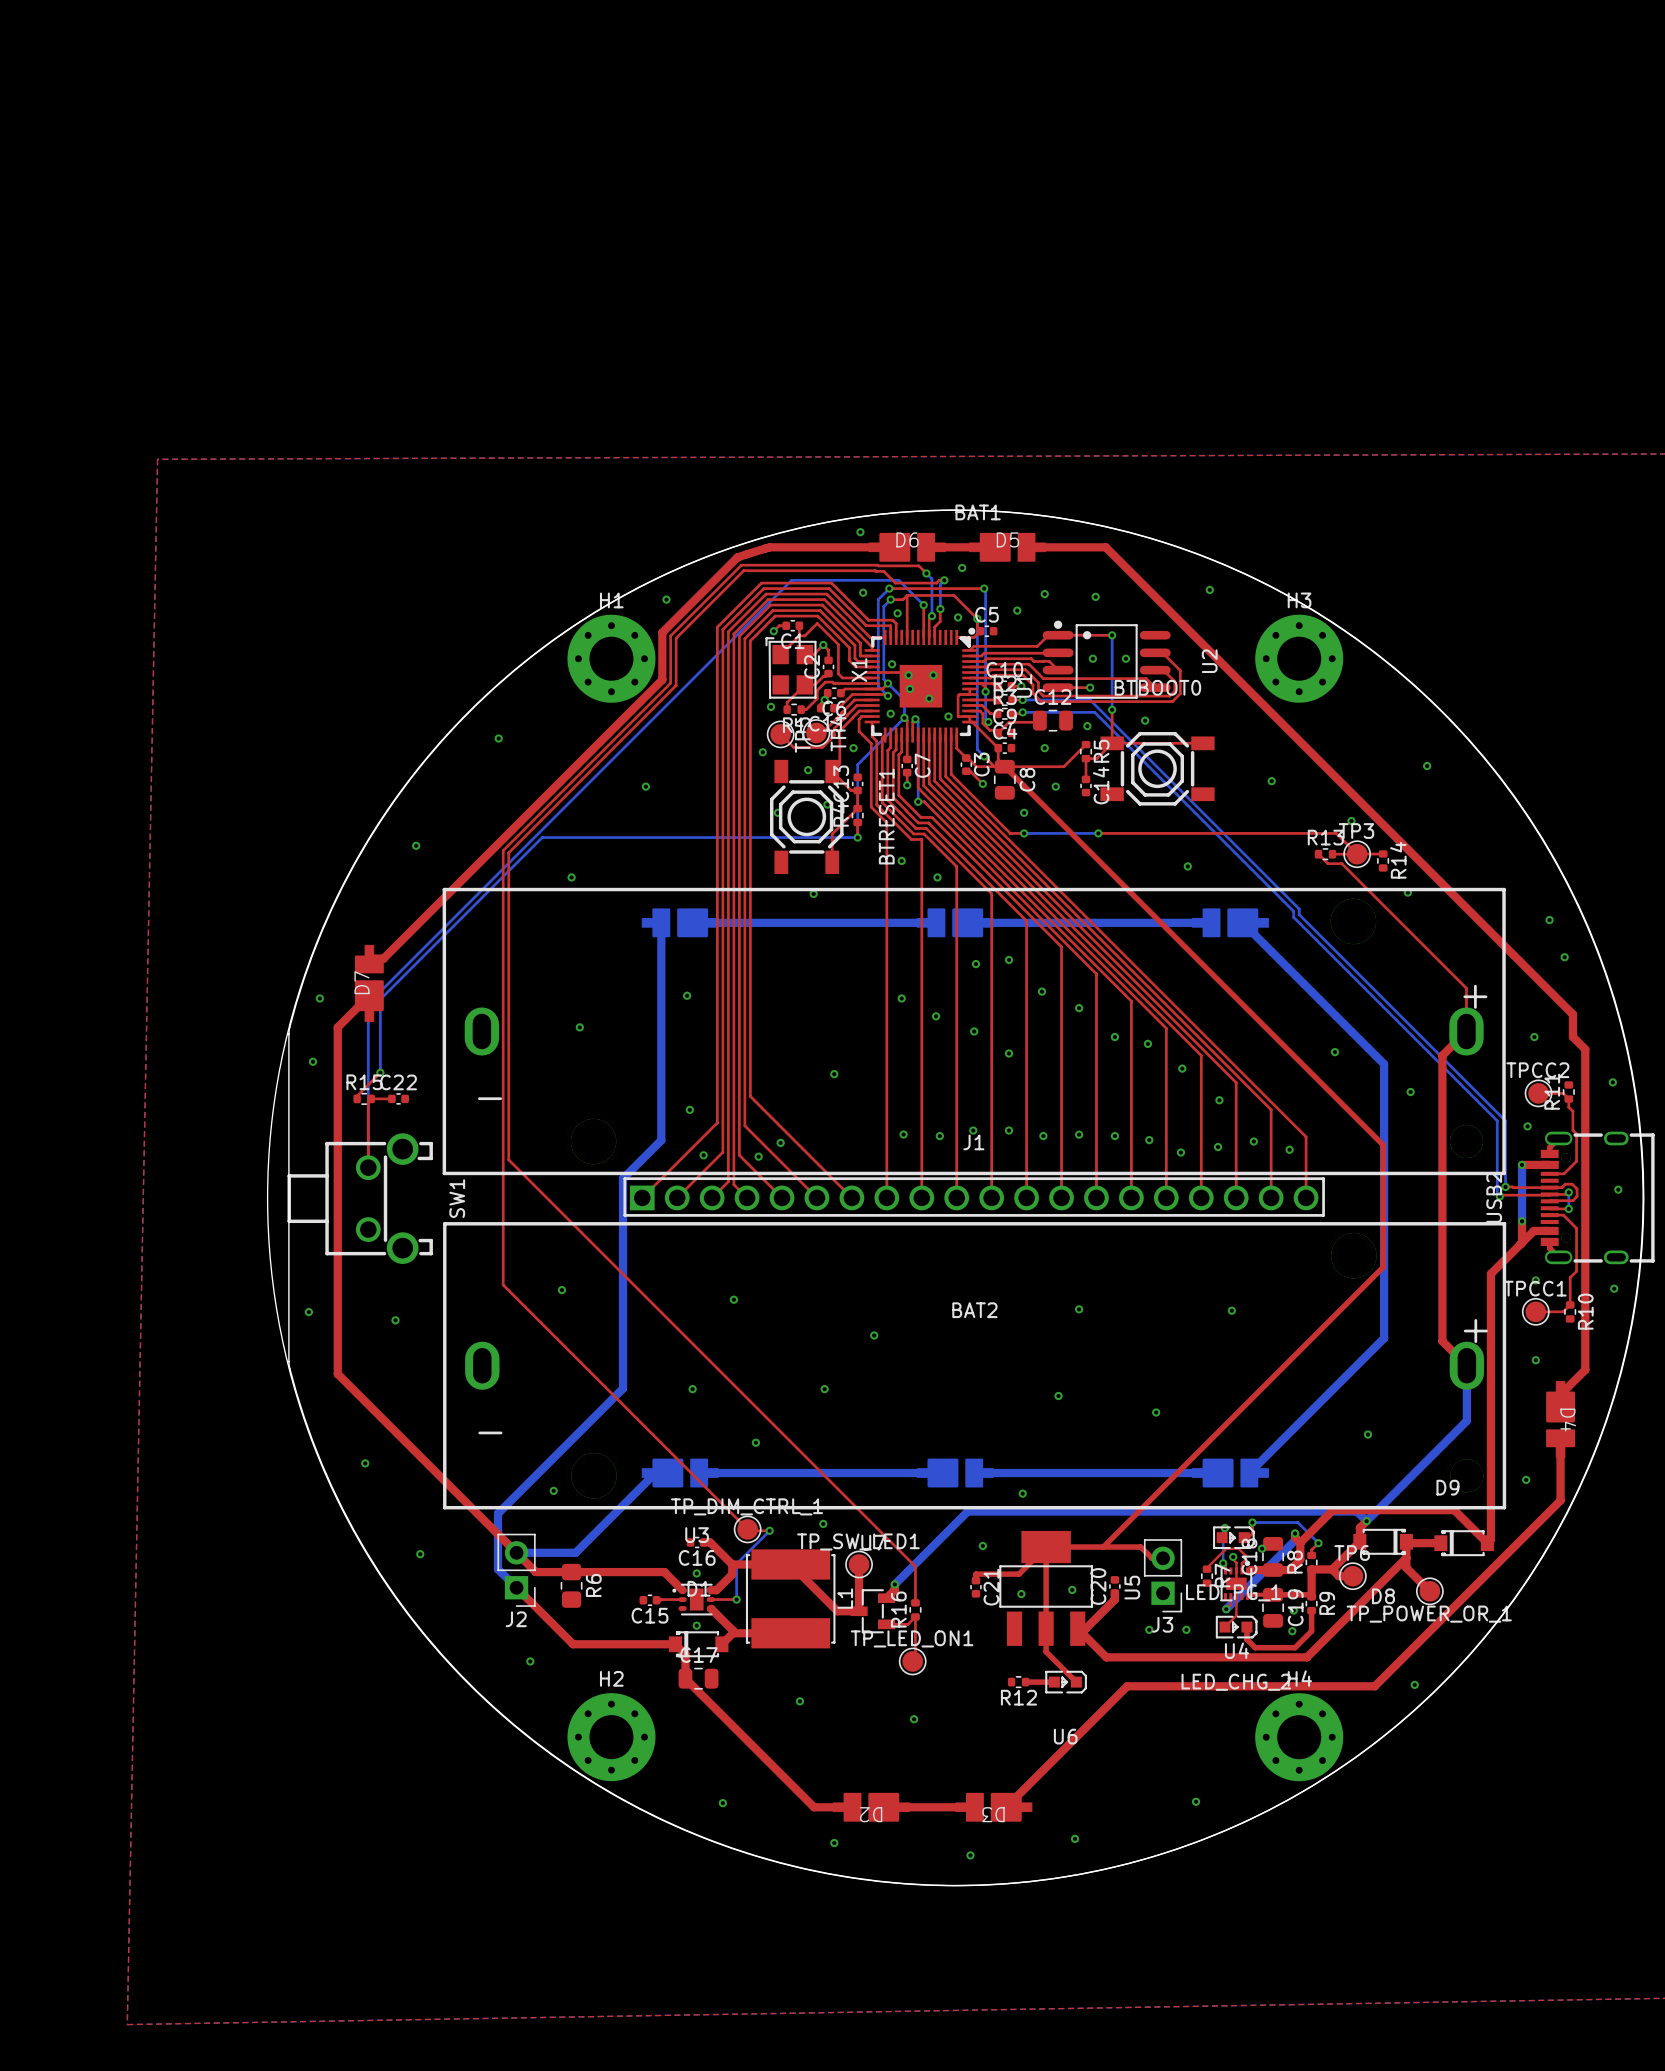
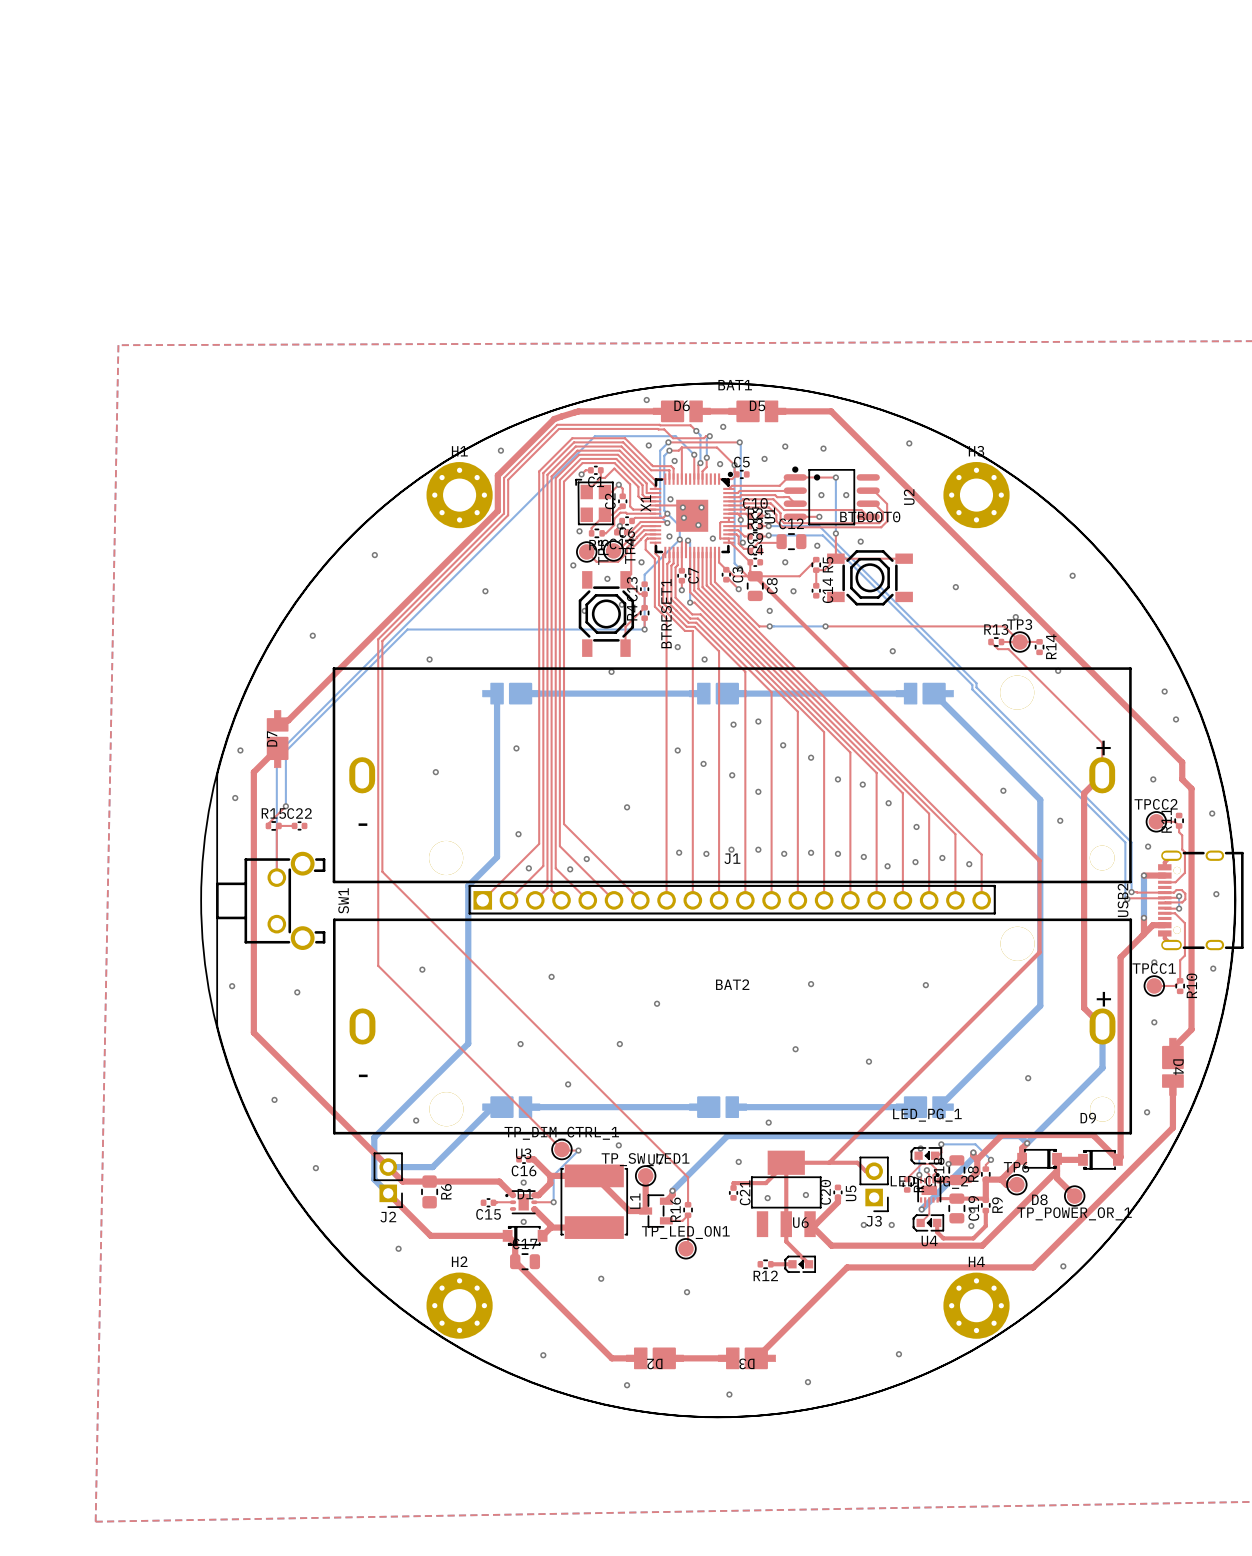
LED_PG_1 rotation: 0° (1233, 1537) -> 180° (926, 1155)
LED_CHG_2 rotation: 0° (1236, 1627) -> 180° (928, 1222)
U6 rotation: 0° (1066, 1682) -> 180° (800, 1264)

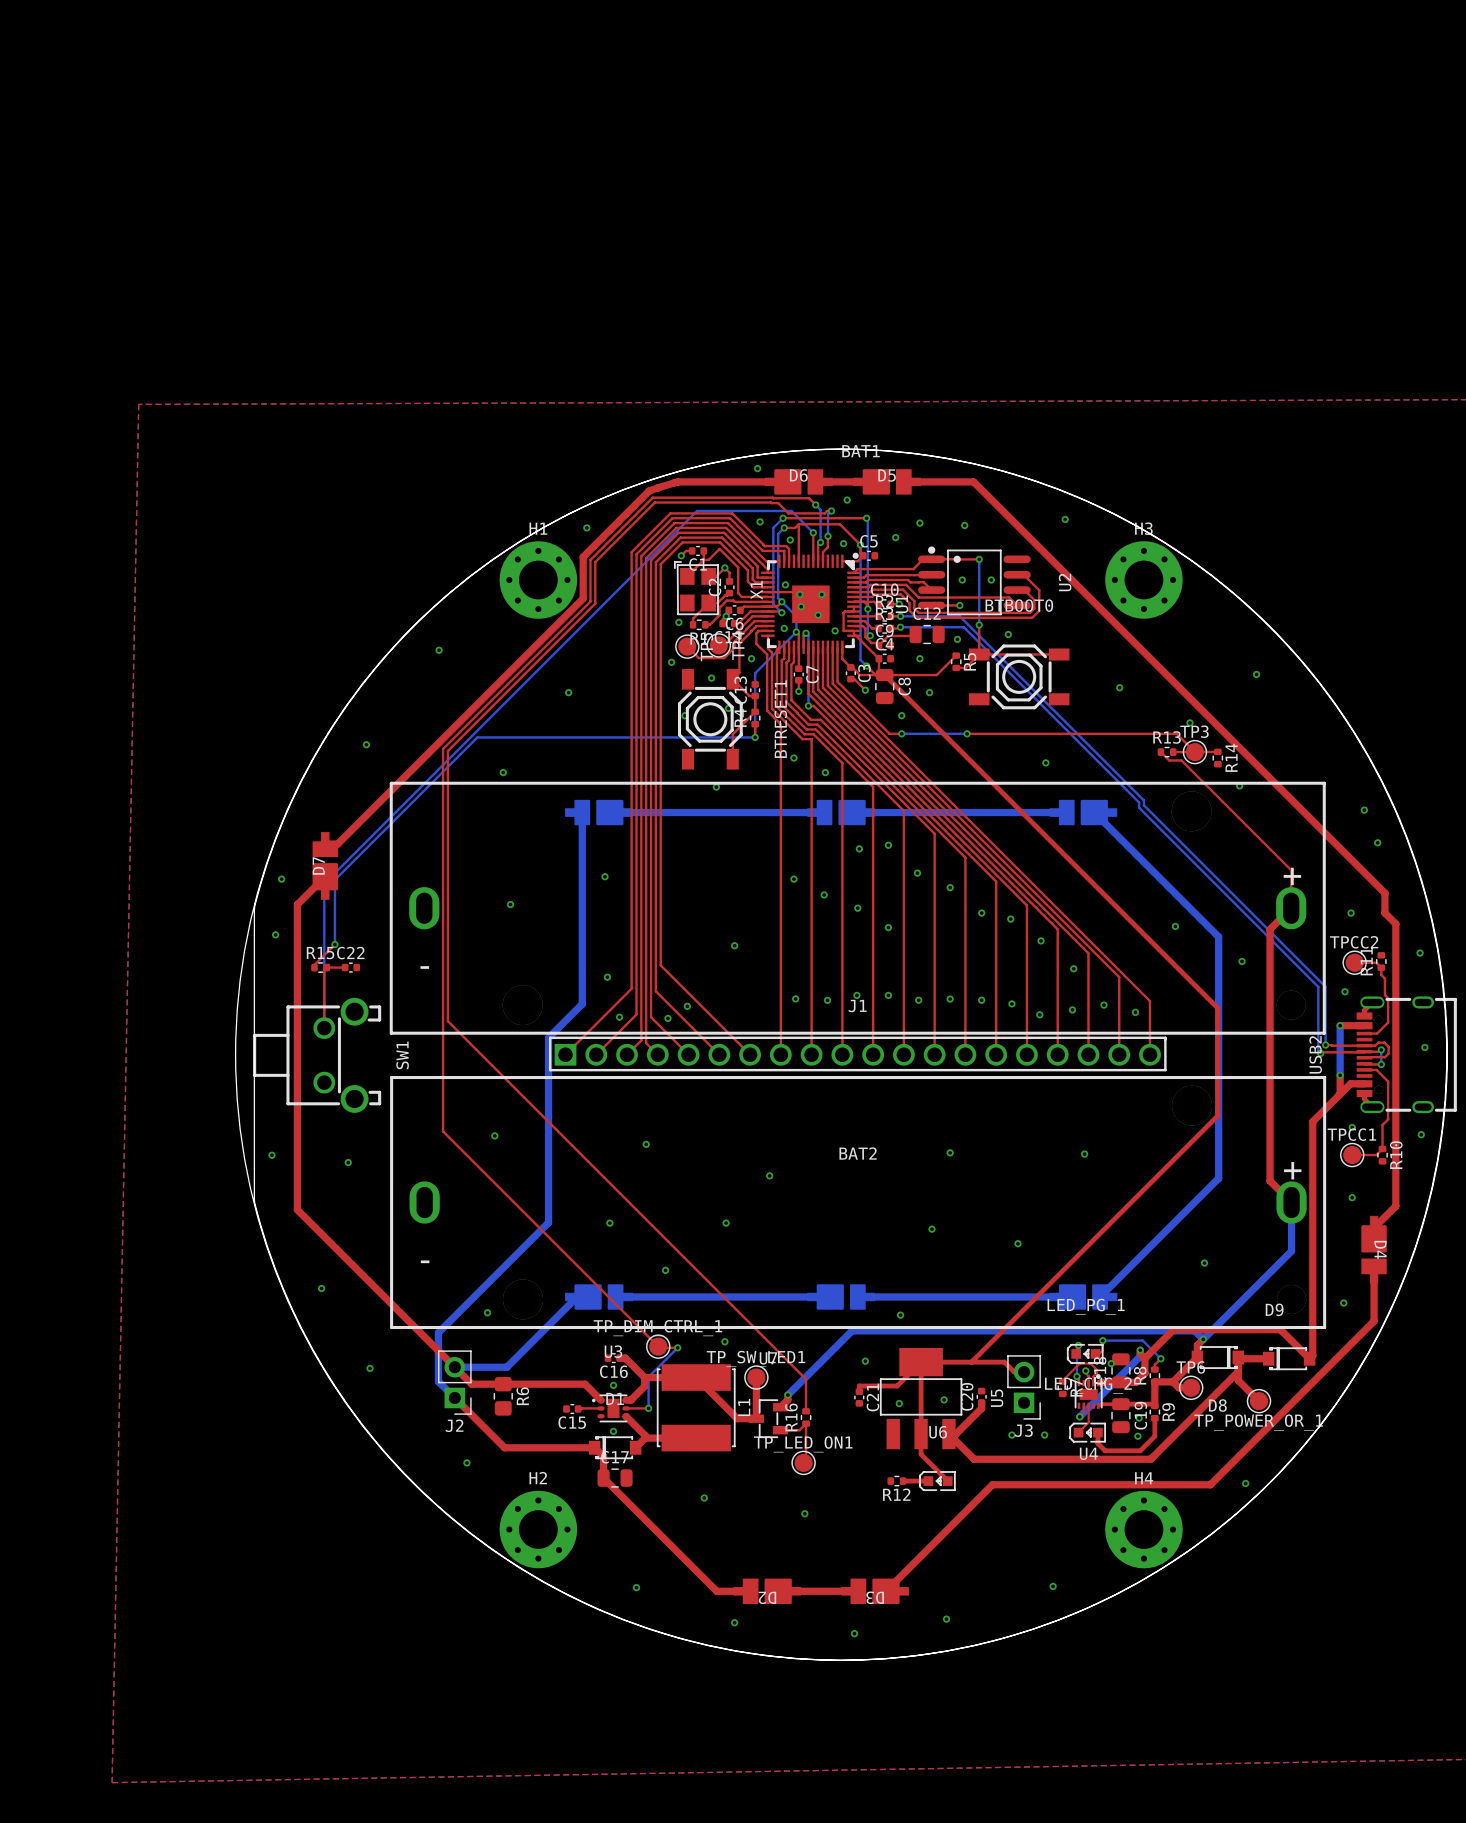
top track: (816, 570) (816, 585) -> none
C14: (816, 590) -> none

